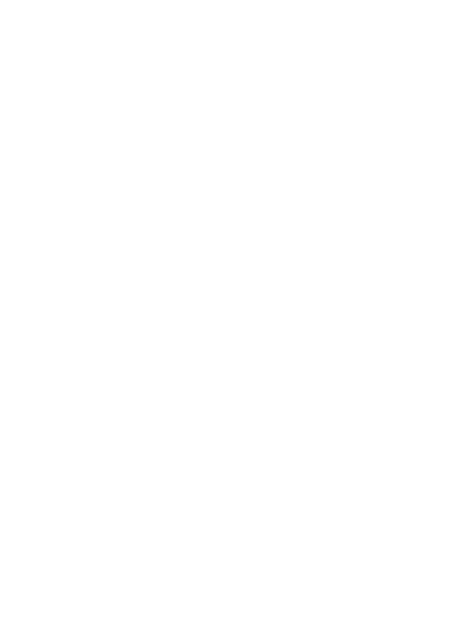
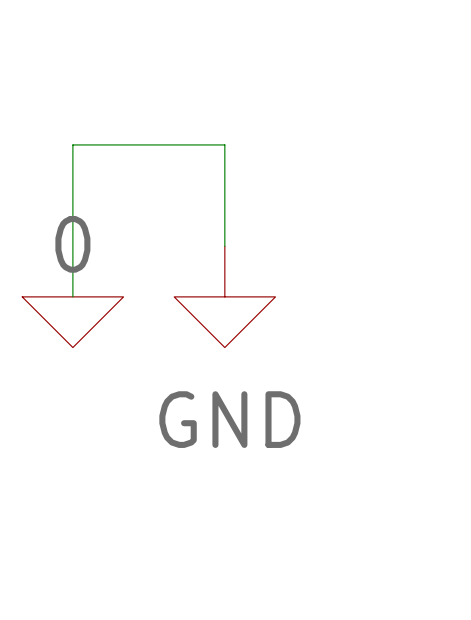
wire: none -> (224, 246) (224, 144) (72, 144) (72, 296)
power symbol: none -> GND (224, 296)
power symbol: none -> 0 (72, 322)

